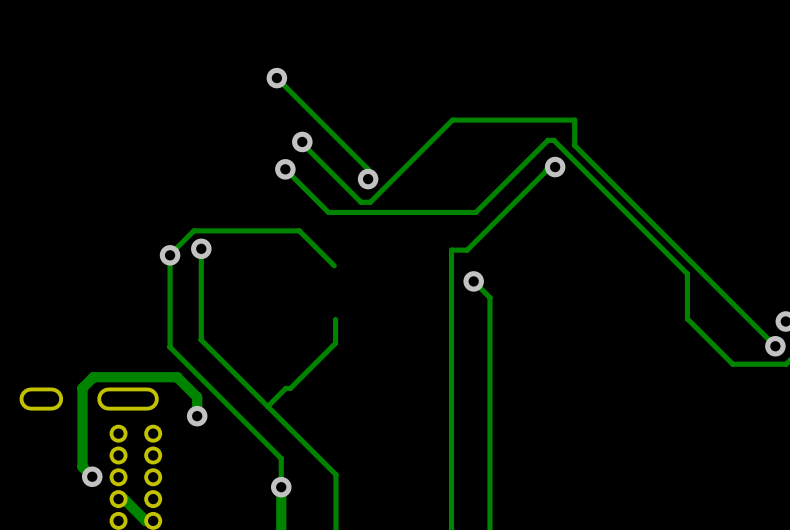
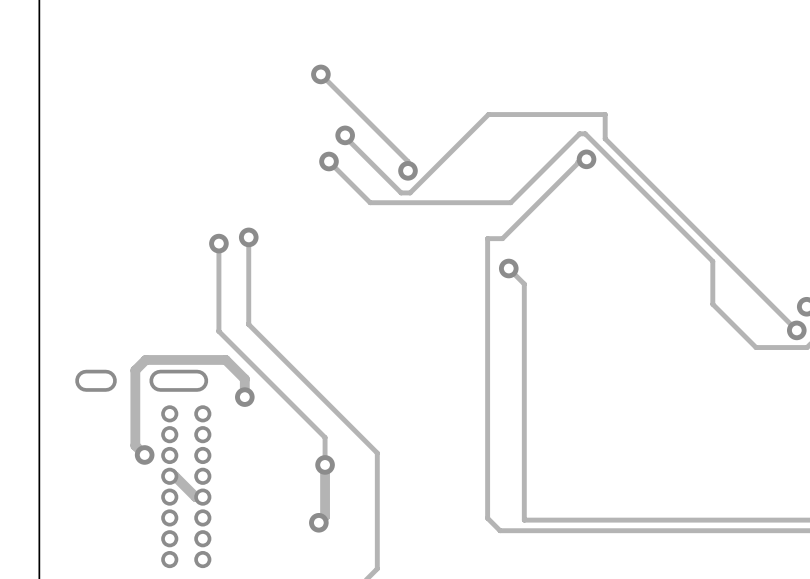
track: (170, 255) (193, 230) (299, 230) (334, 265) -> none
track: (335, 319) (335, 343) (290, 388) (285, 388) (267, 406) -> none

